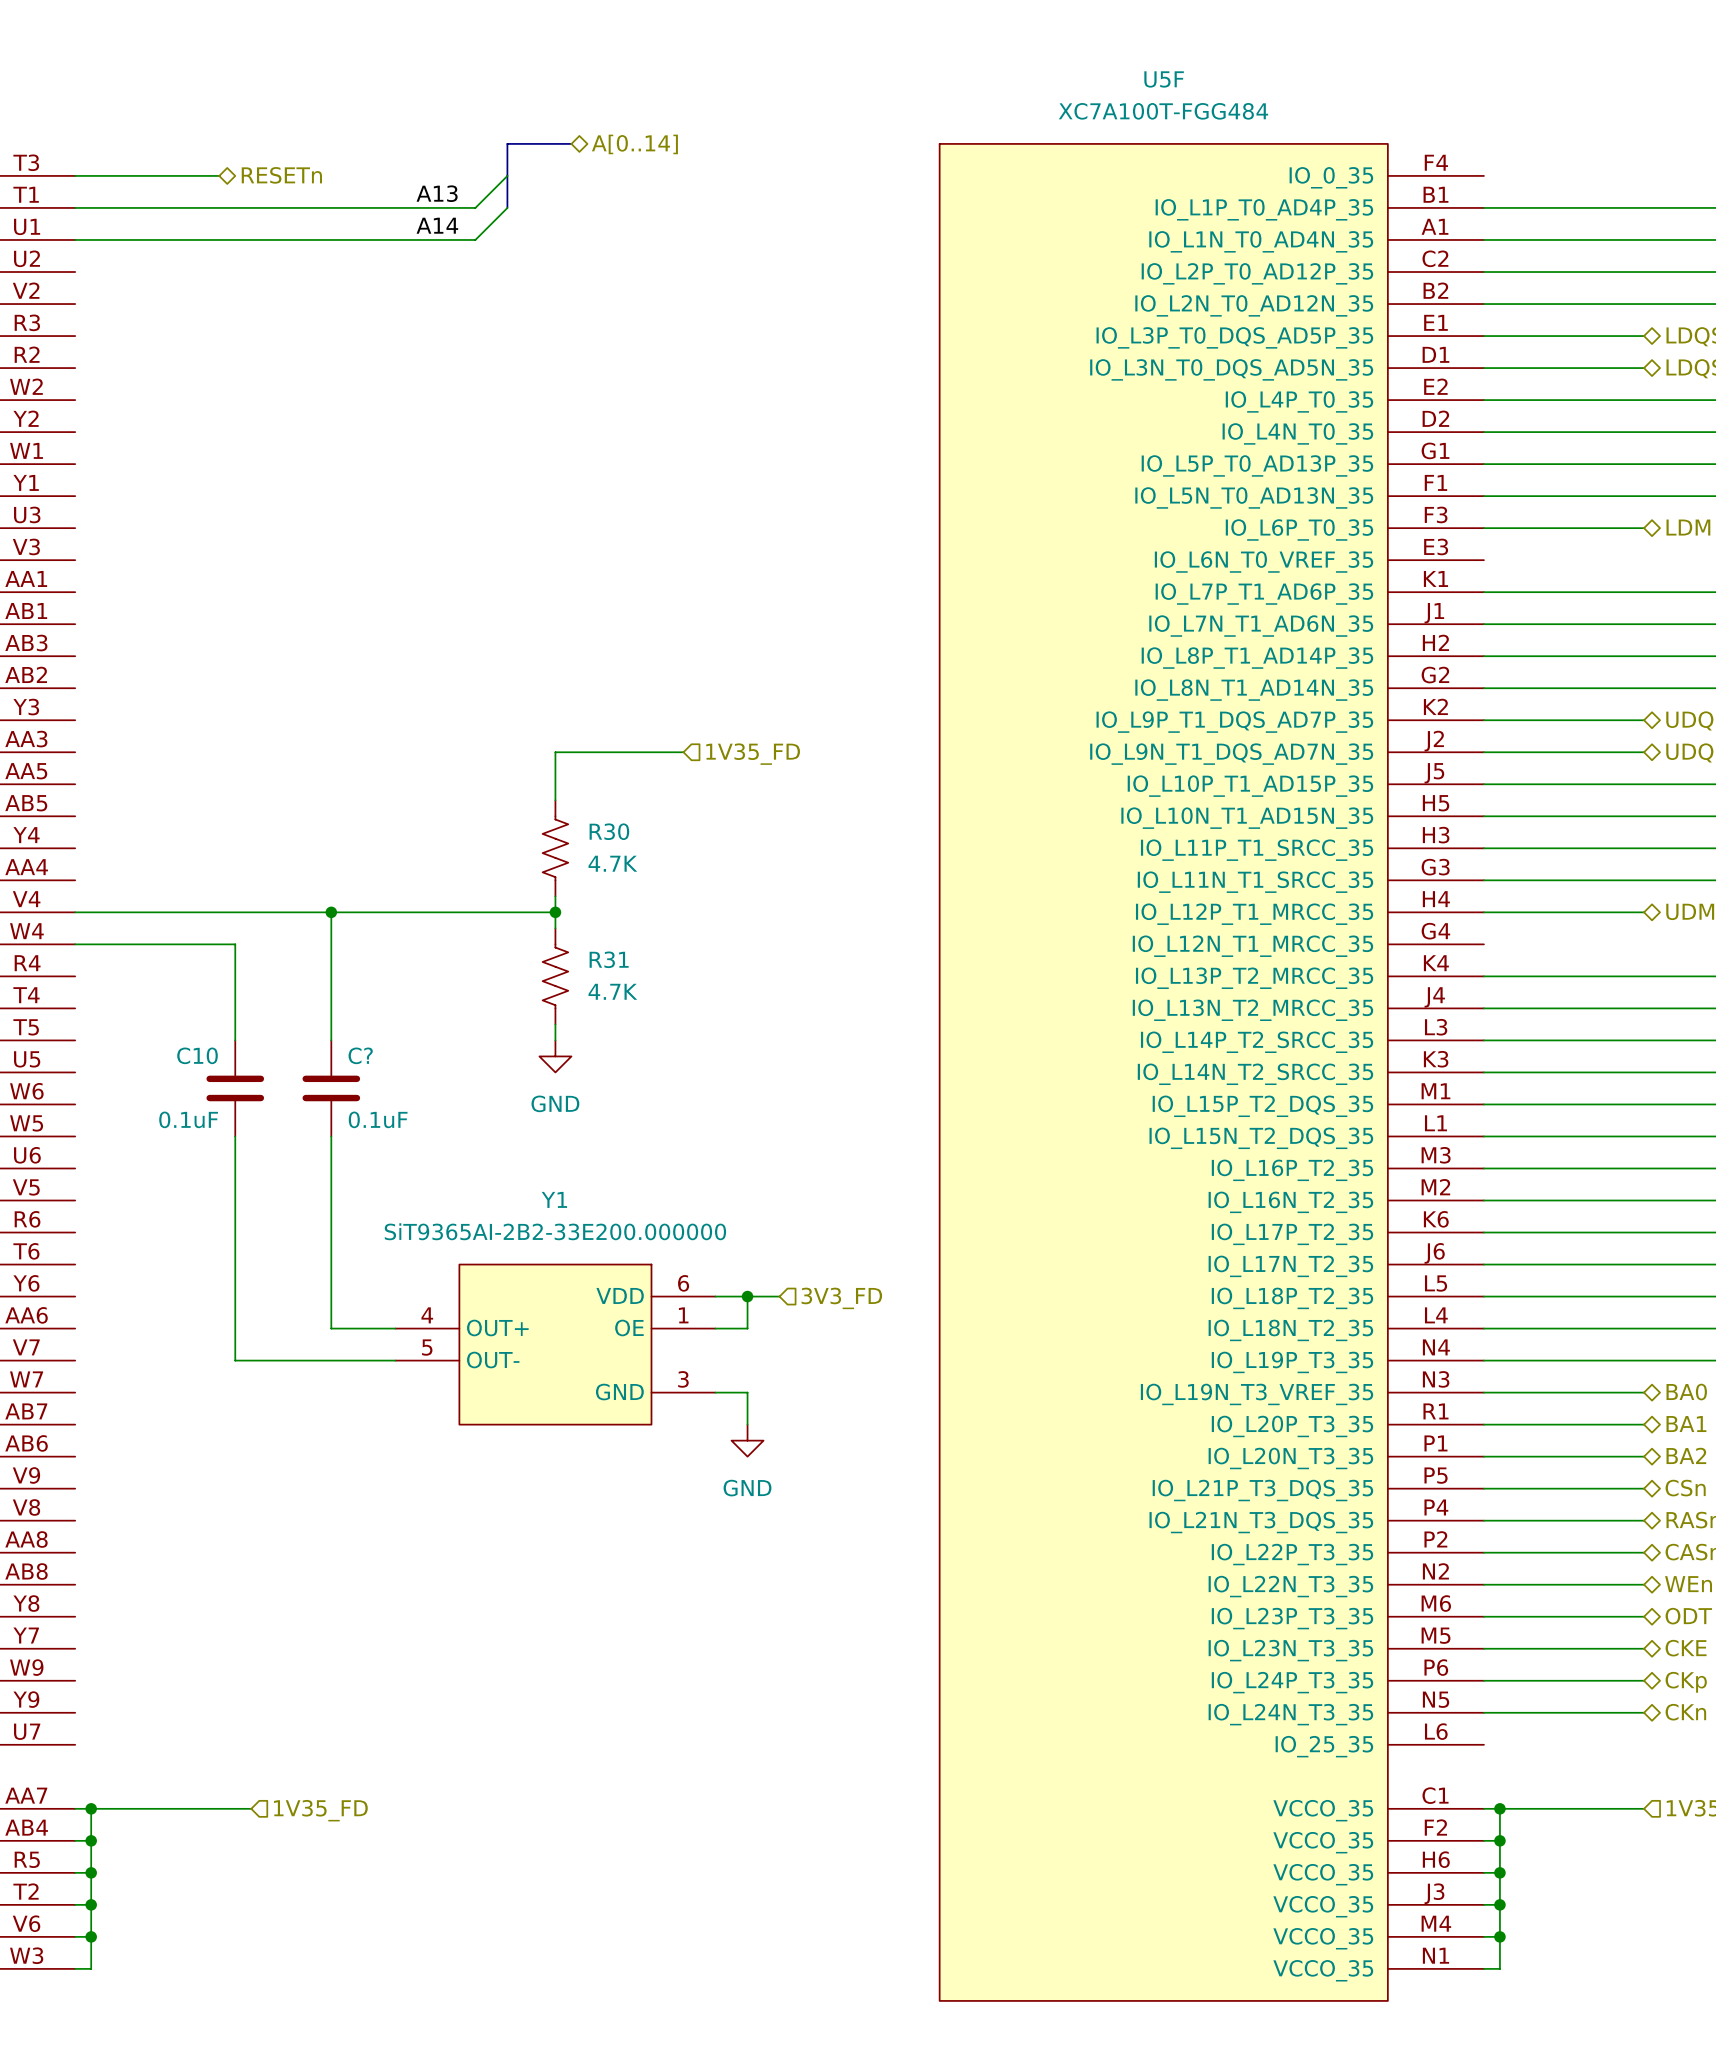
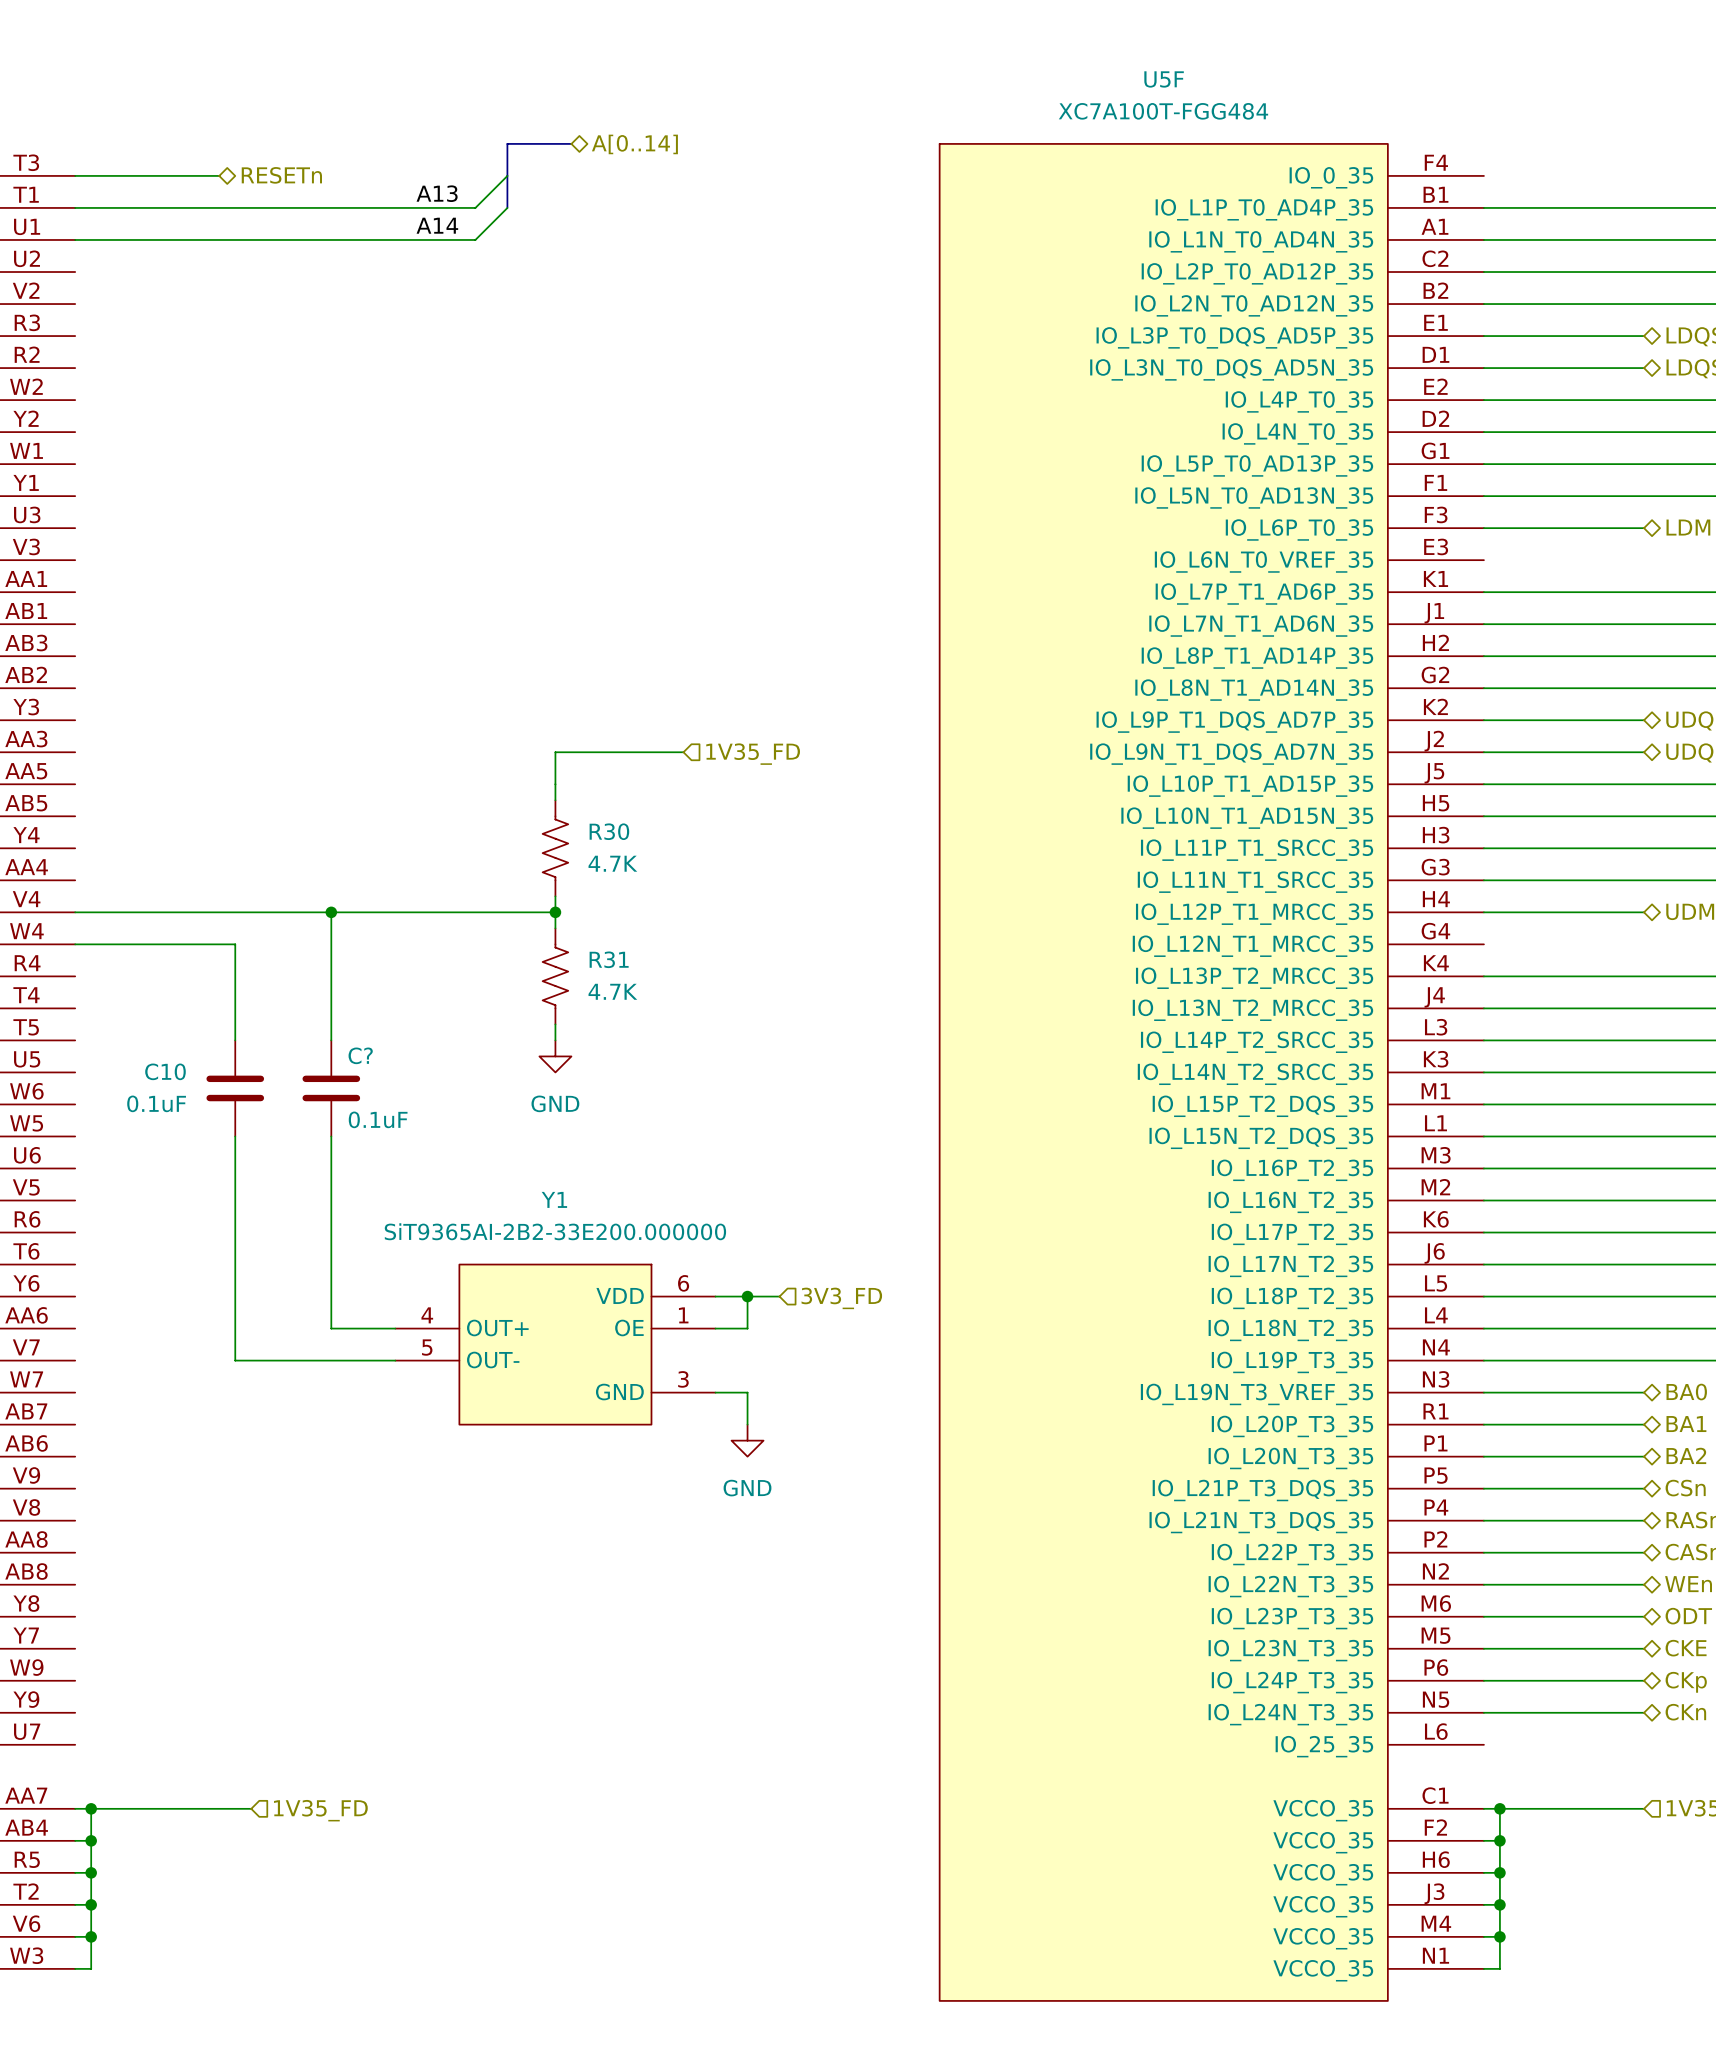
C10 name position: C10 (197, 1055) -> C10 (165, 1071)
C10 value position: 0.1uF (188, 1119) -> 0.1uF (156, 1103)

